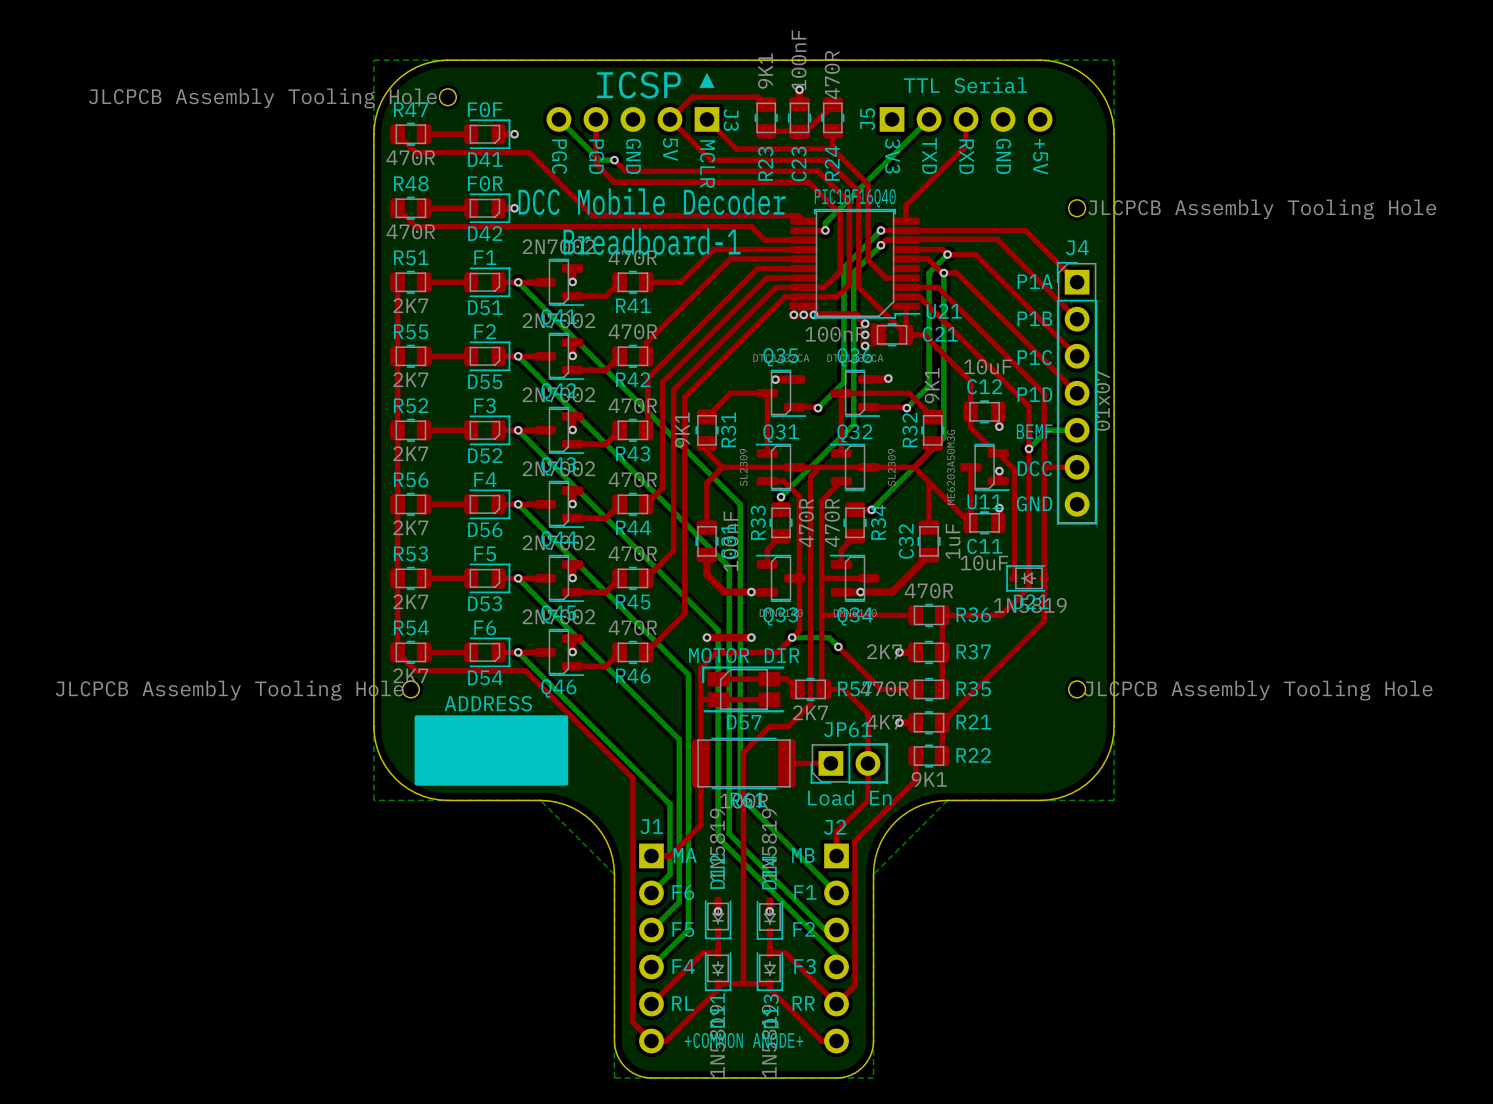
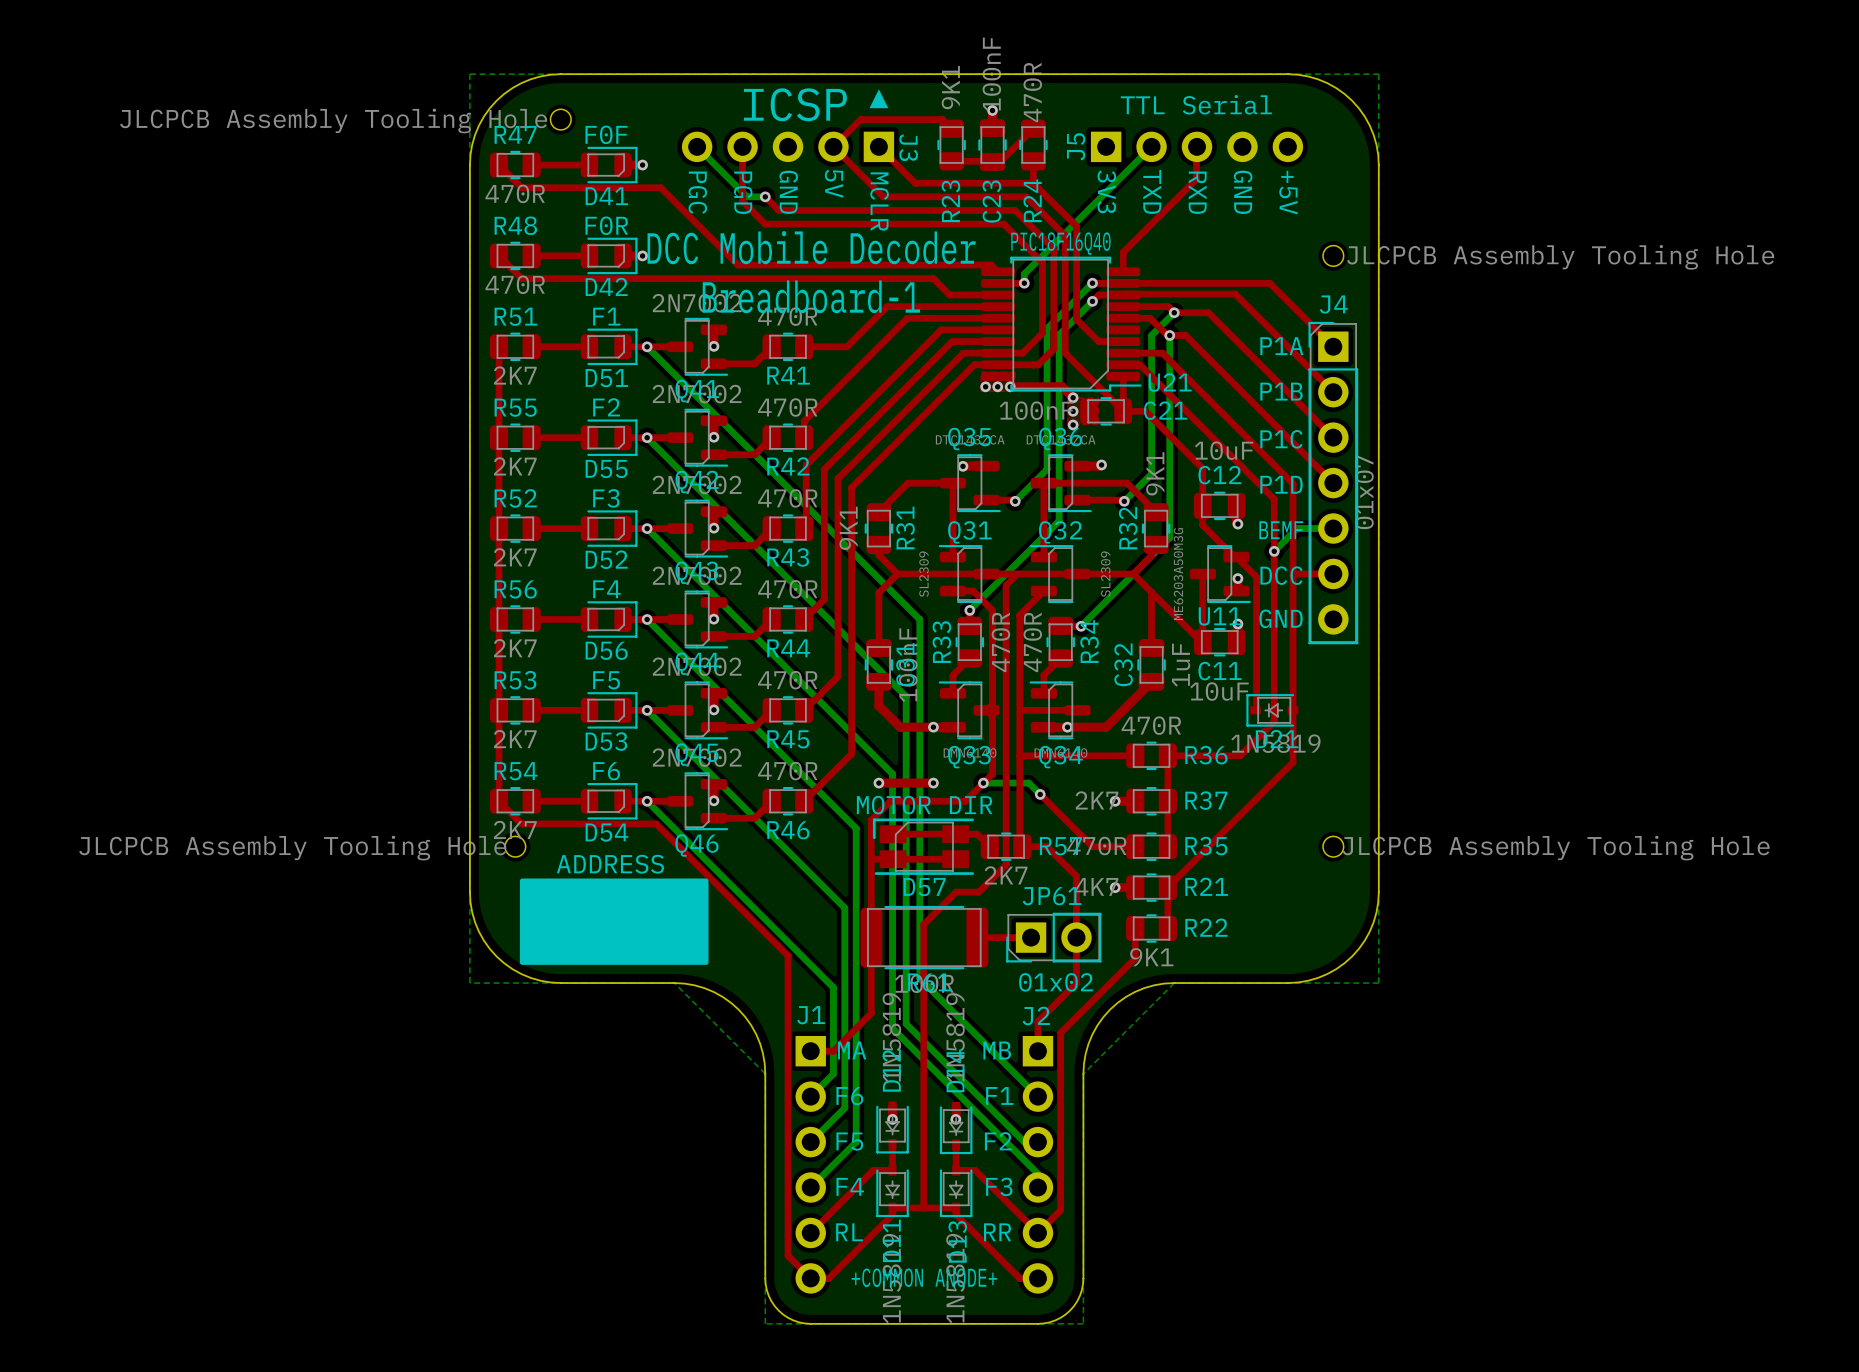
JP61 text: Load En (849, 797) -> none
JP61 value: none -> 01x02 (1056, 982)

